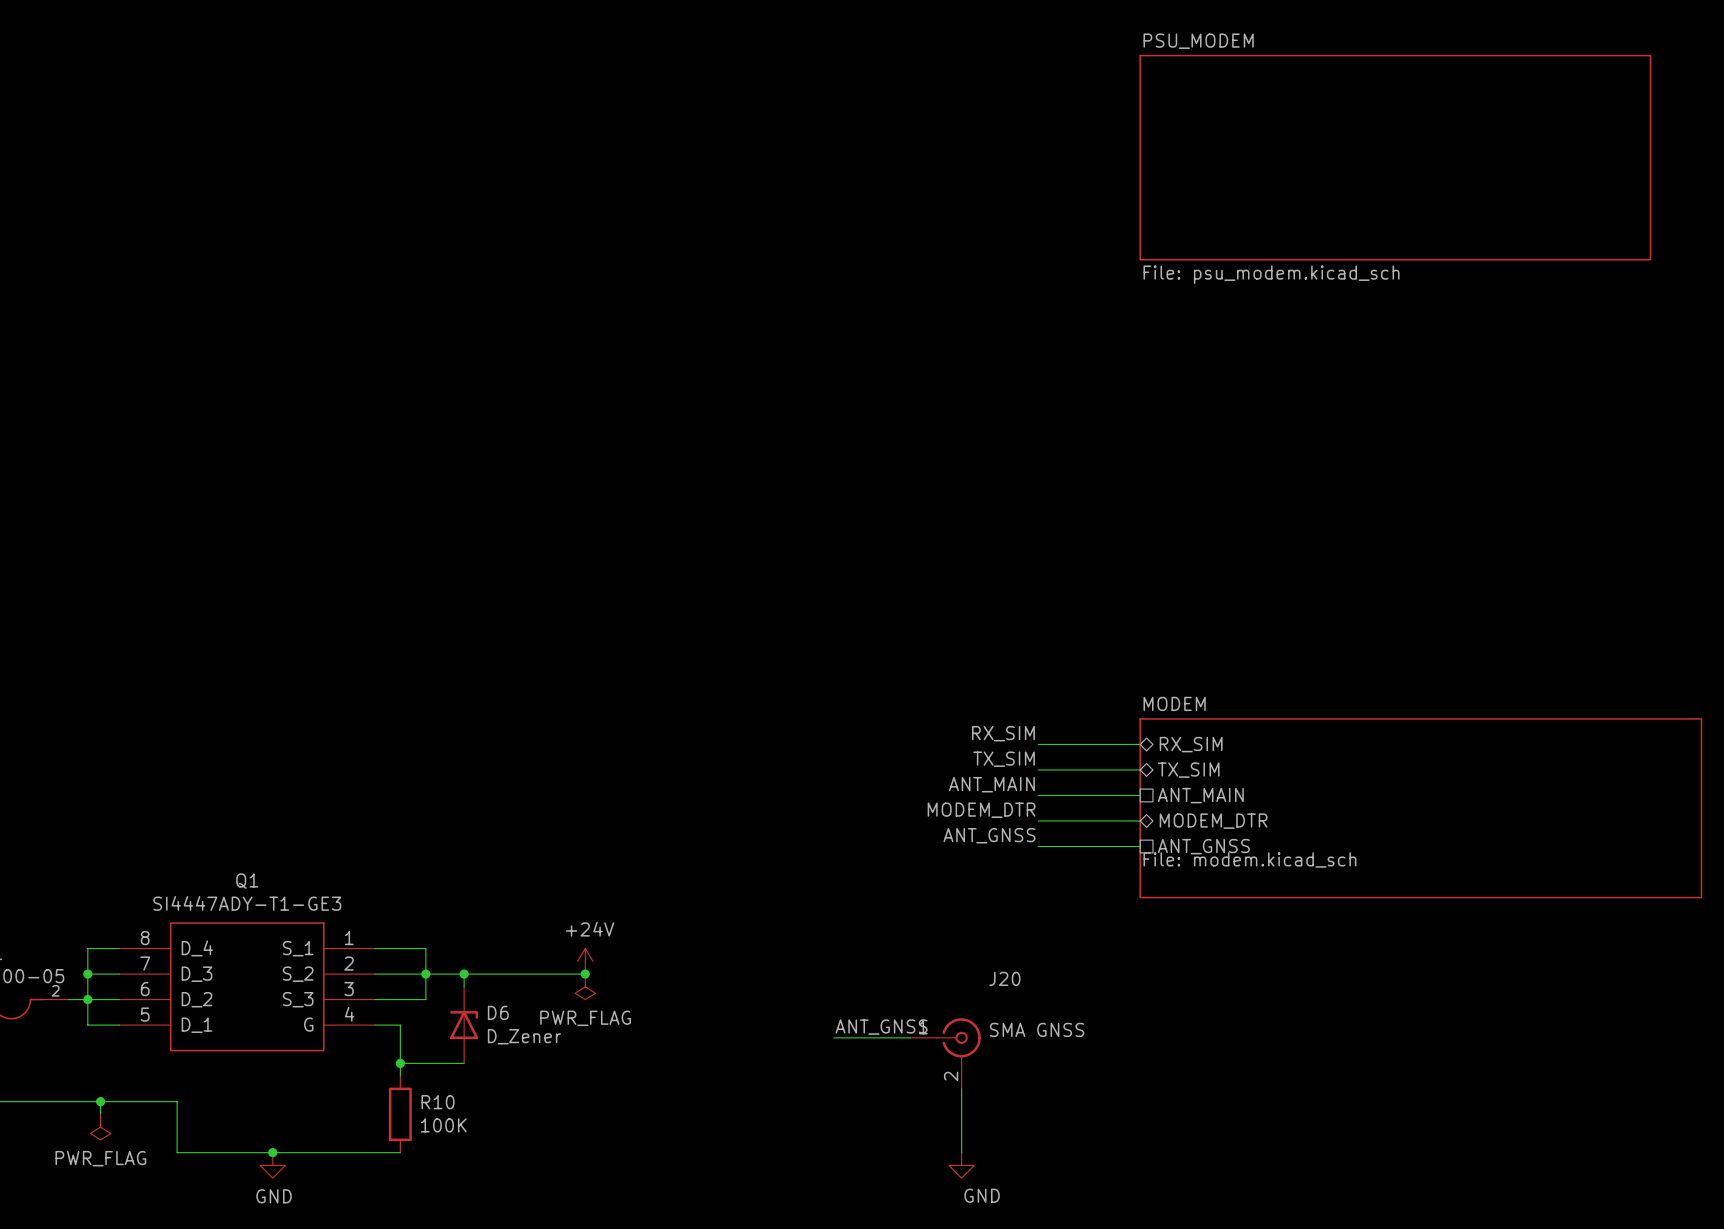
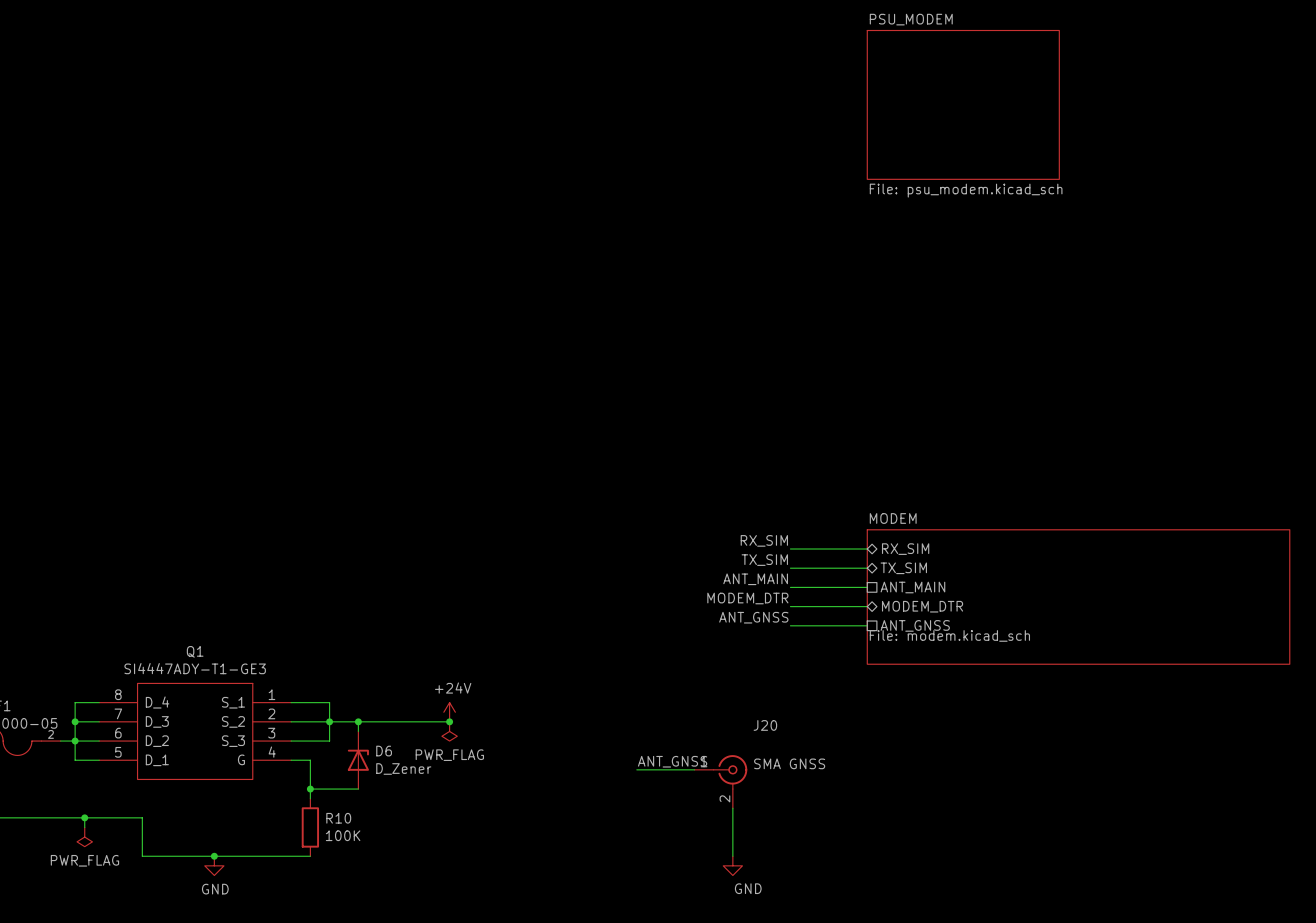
sheet PSU_MODEM: none -> File: psu_modem.kicad_sch (963, 104)
sheet PSU_MODEM: File: psu_modem.kicad_sch (1395, 157) -> none

